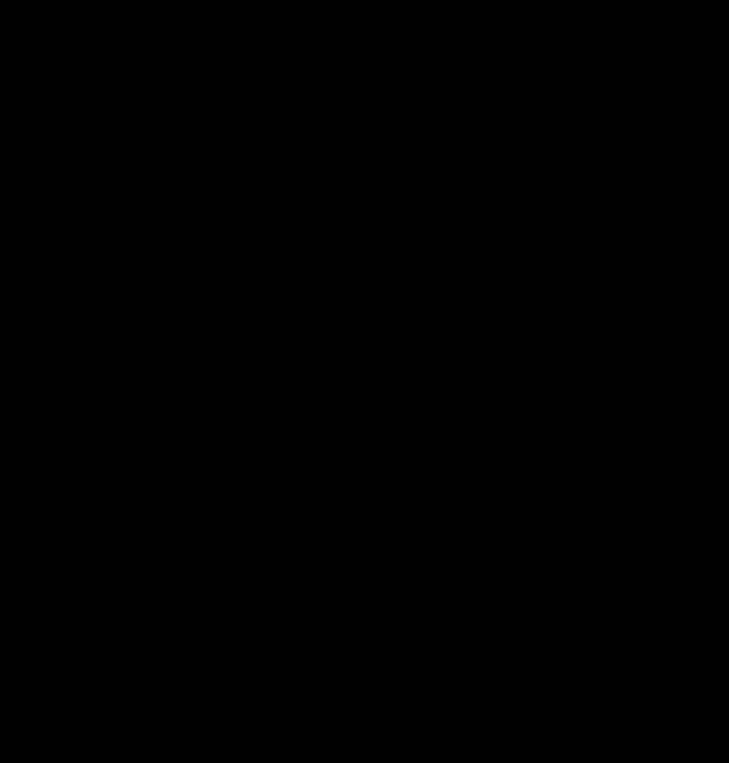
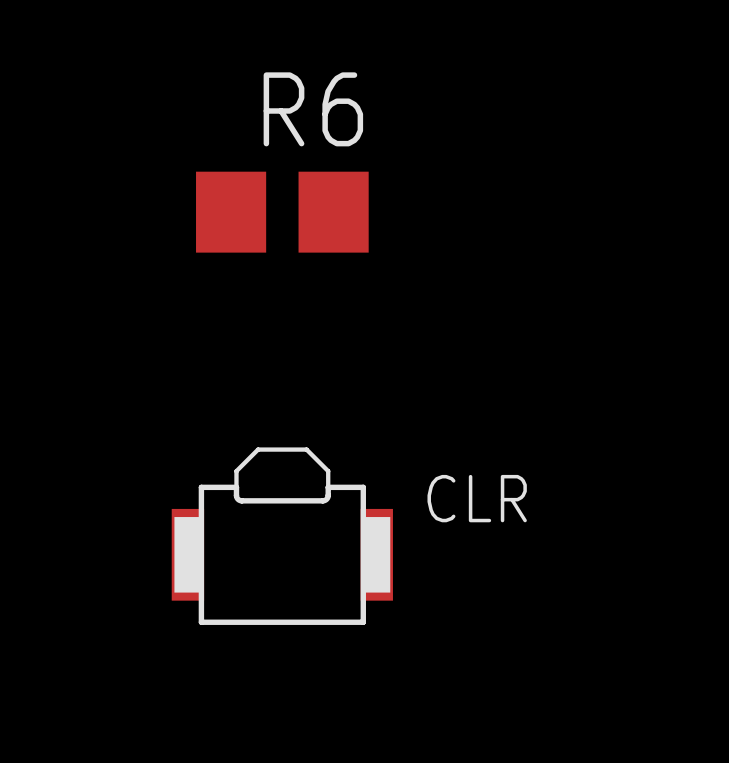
R6: none -> (282, 212)
CLR: none -> (282, 536)

